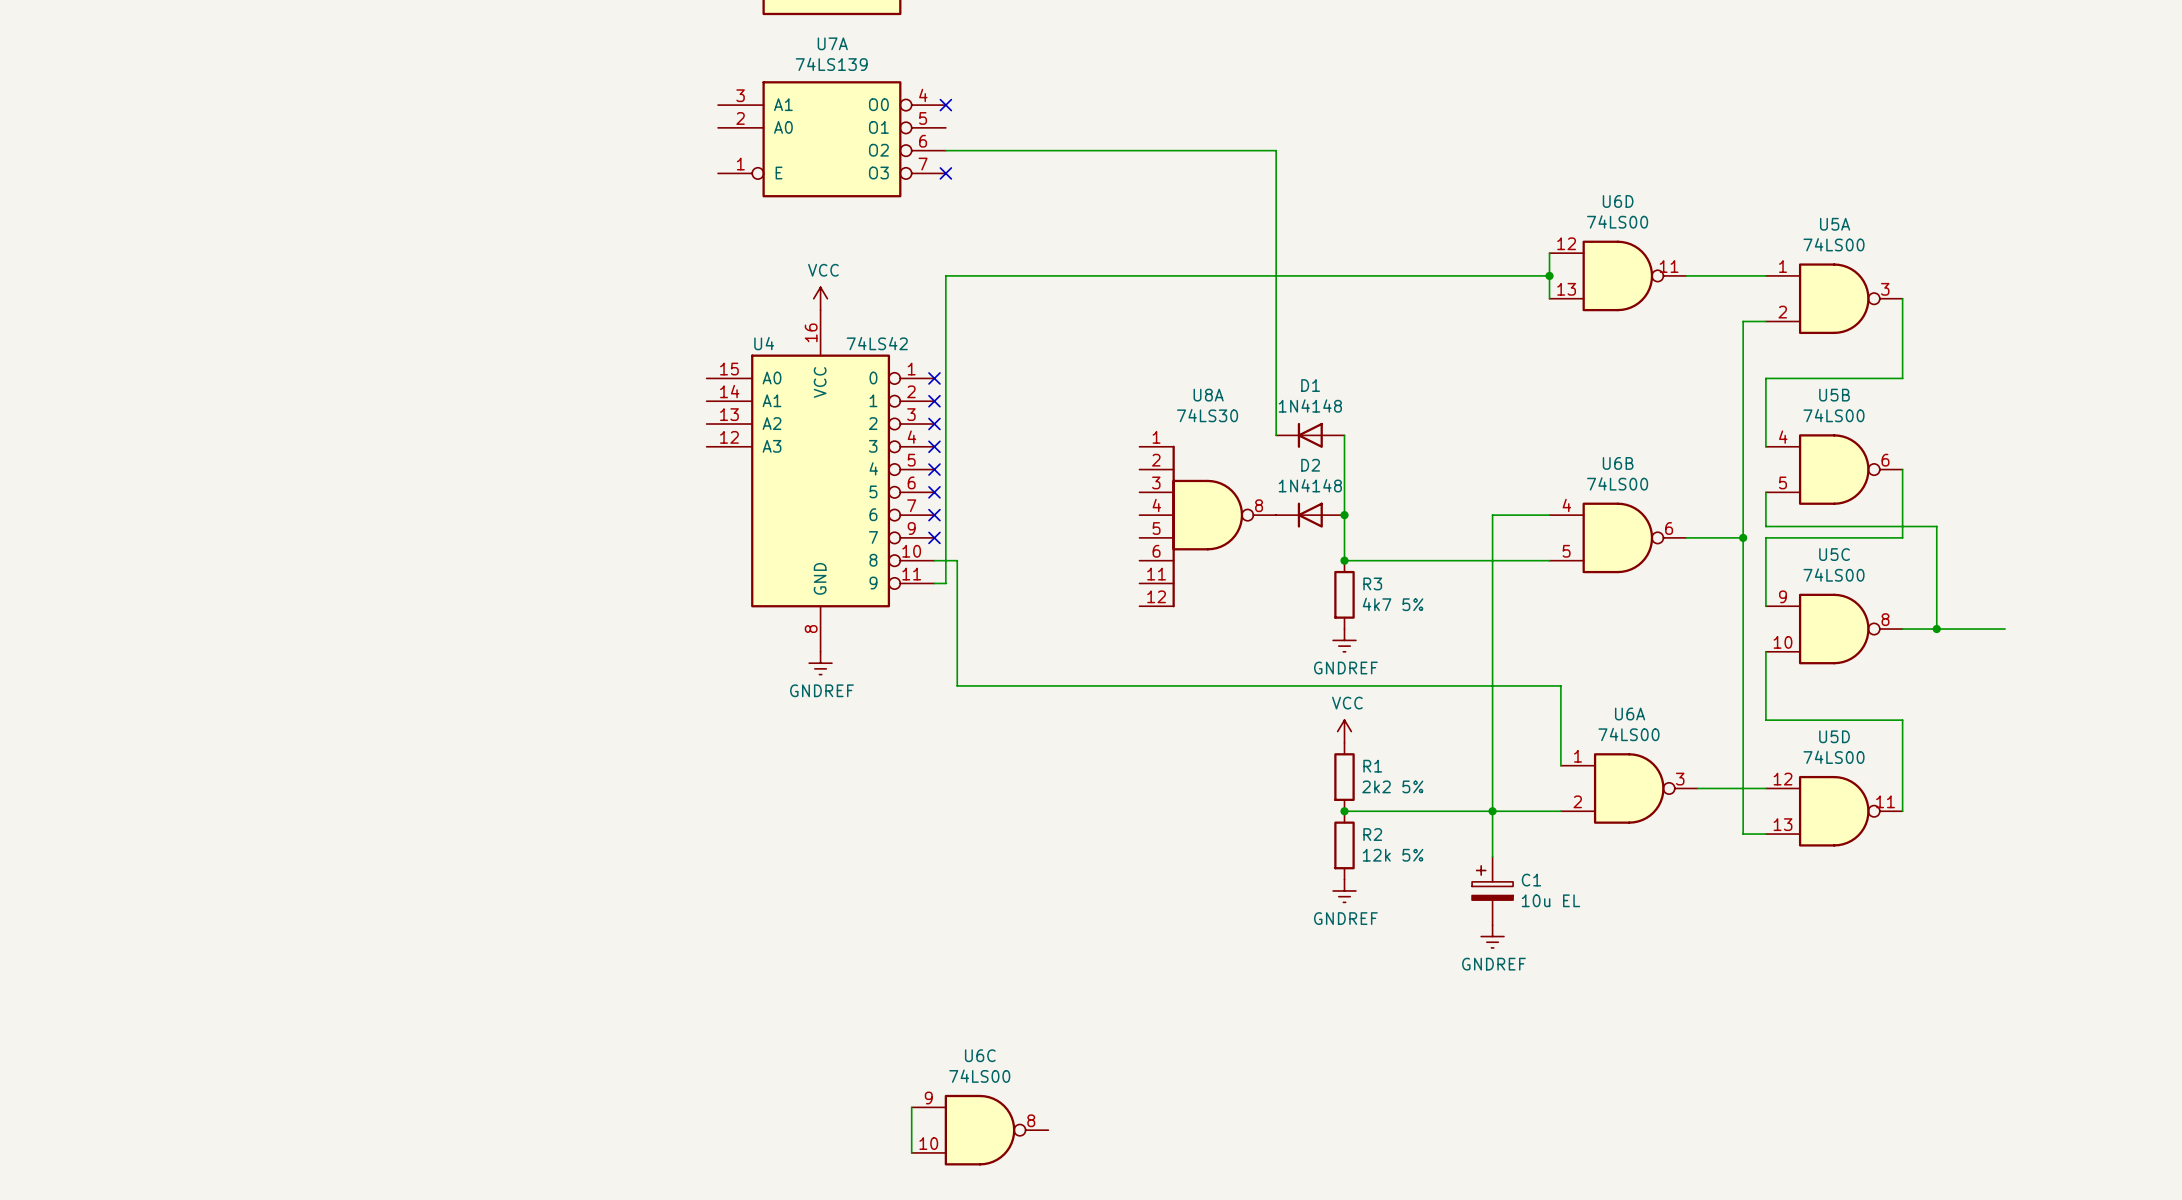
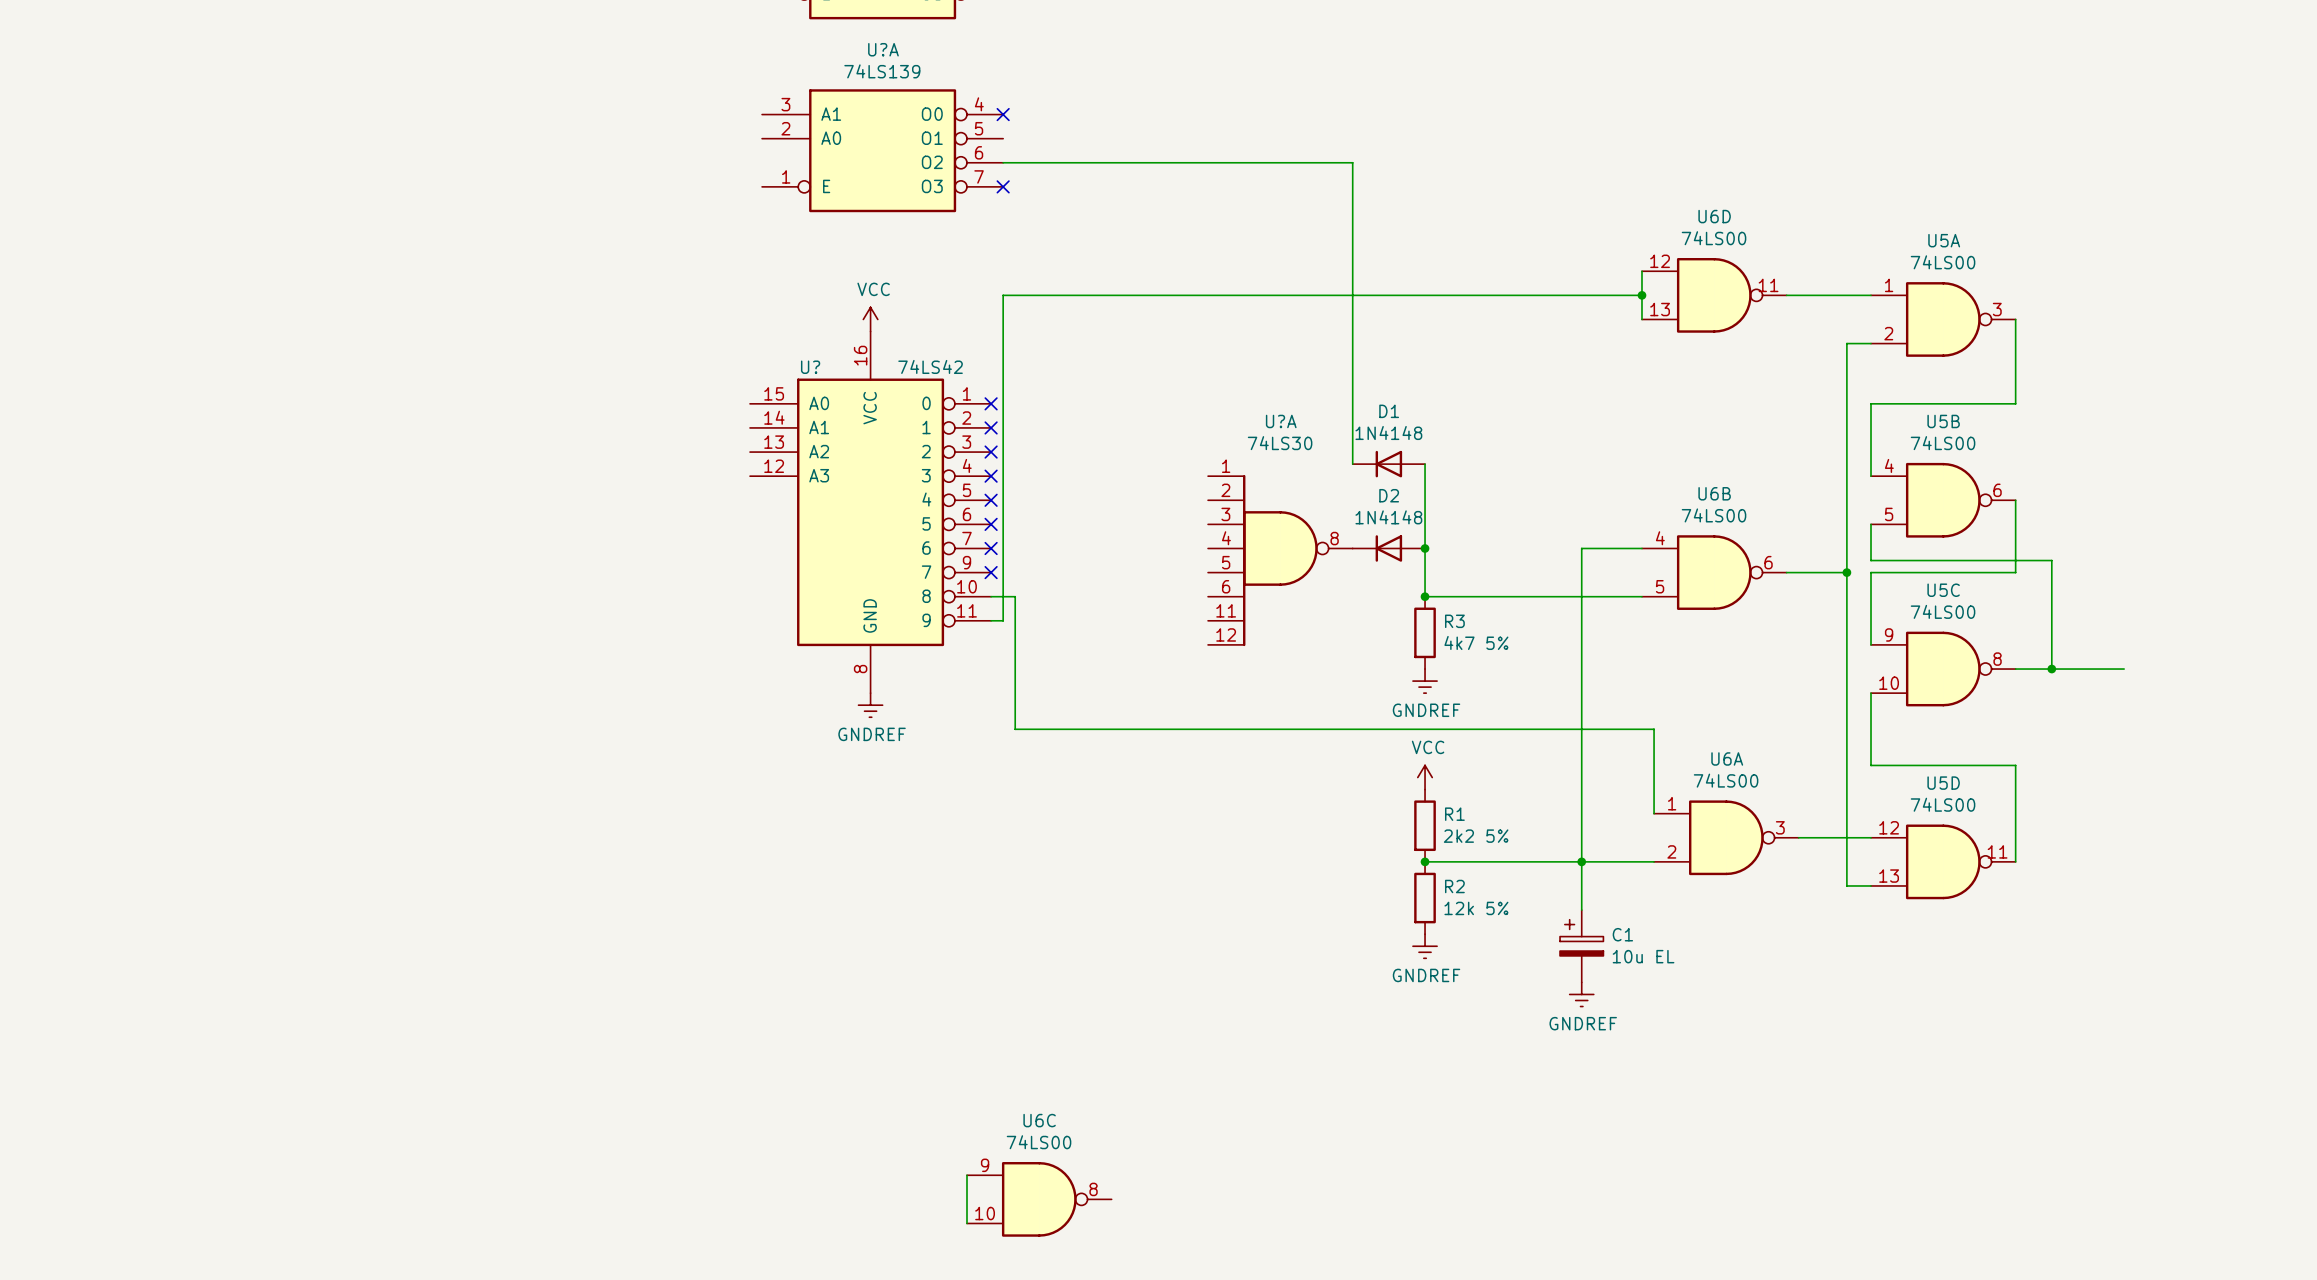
U7A name: U7A (832, 43) -> U?A (883, 49)
U4 name: U4 (764, 343) -> U? (810, 367)
U8A name: U8A (1208, 395) -> U?A (1281, 421)

